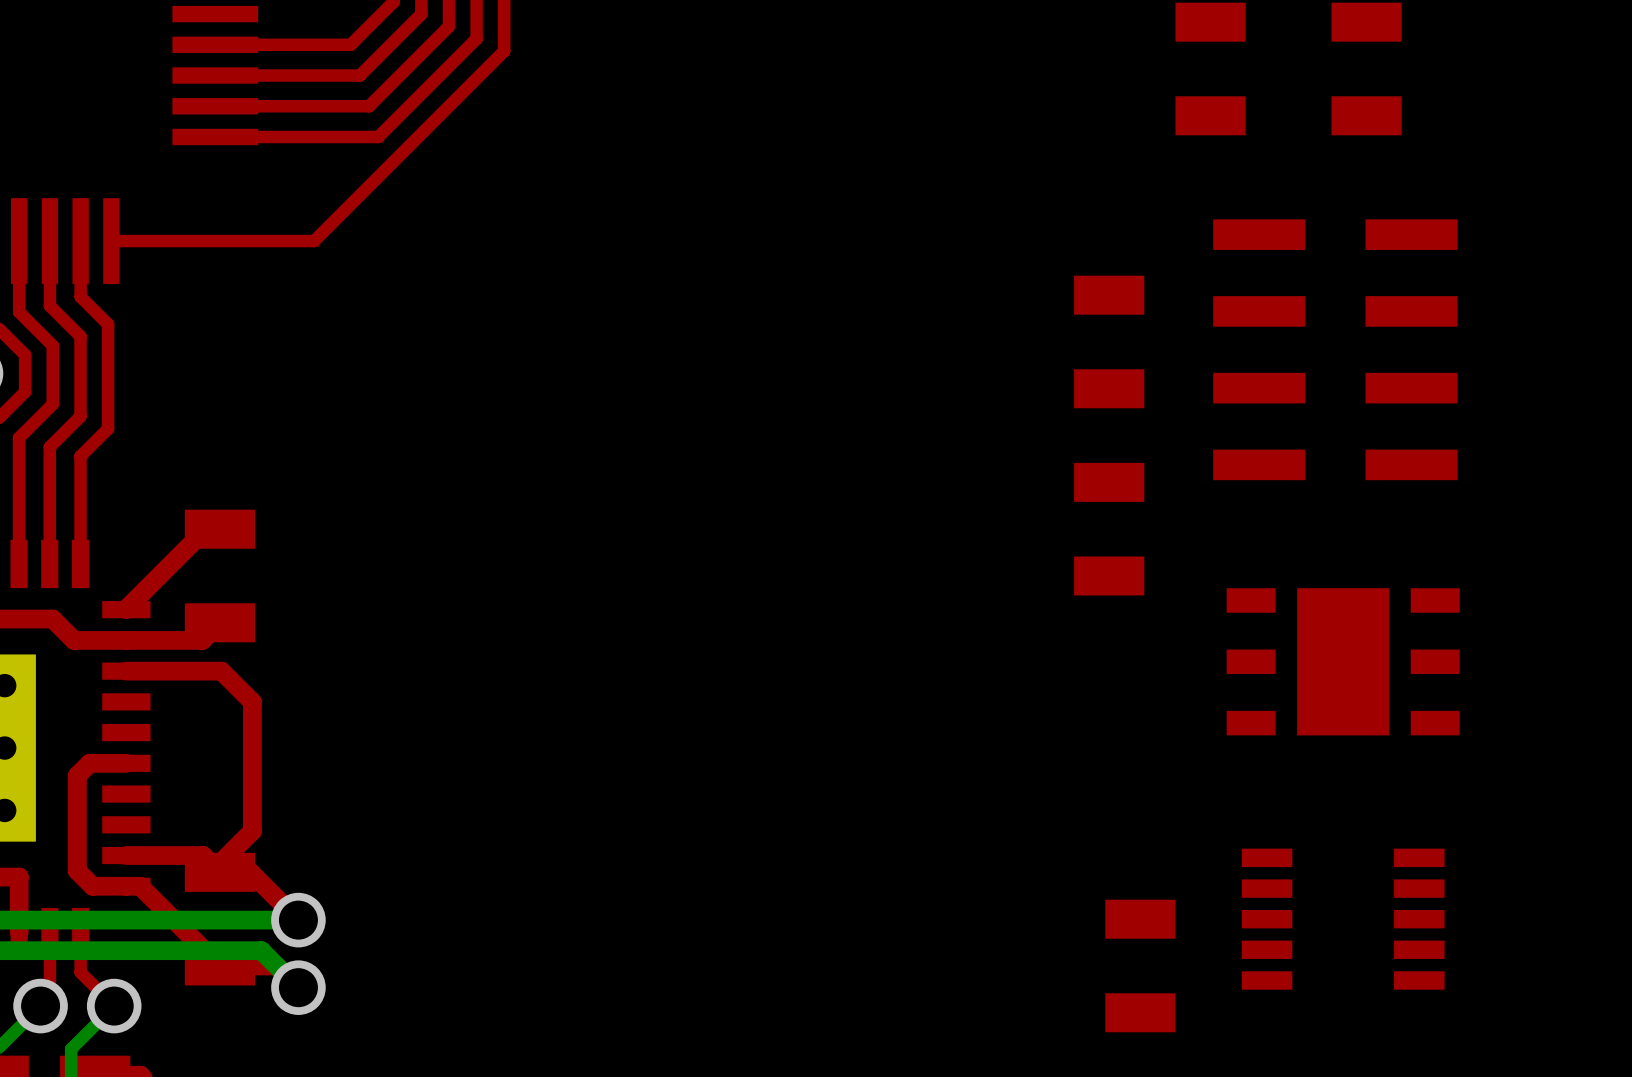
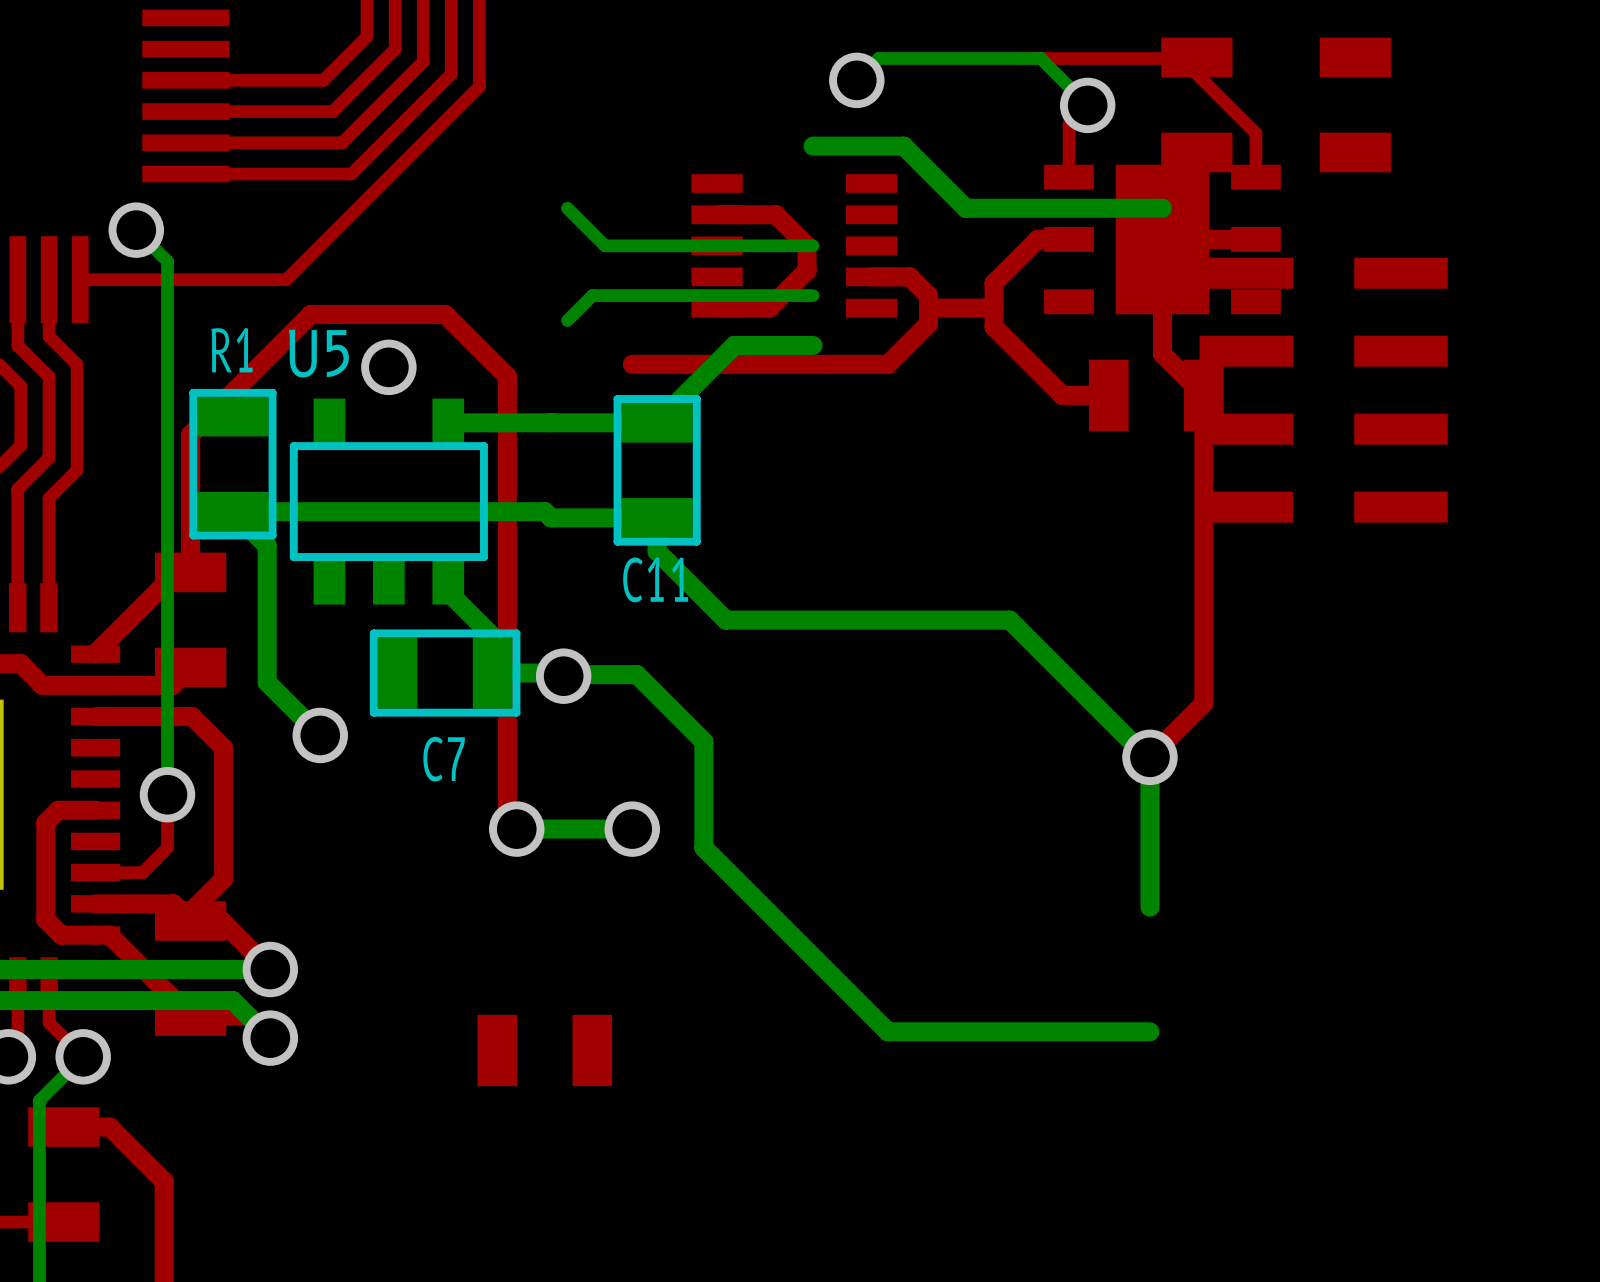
top track: none -> (1023, 58) (1181, 58) (1255, 133) (1255, 177)
bottom track: none -> (856, 80) (878, 58) (1040, 58) (1087, 105)
via: none -> (856, 80)
top track: none -> (1087, 105) (1068, 124) (1068, 177)
via: none -> (1087, 105)
bottom track: none -> (813, 146) (903, 146) (965, 208) (1162, 208)
bottom track: none -> (567, 208) (605, 245) (813, 245)
top track: none -> (717, 214) (775, 214) (807, 245) (807, 270) (769, 308) (717, 308)
bottom track: none -> (136, 230) (167, 261) (167, 794)
via: none -> (136, 230)
top track: none -> (1068, 239) (1037, 239) (994, 283) (994, 326) (1062, 395) (1108, 395)
top track: none -> (1255, 239) (1162, 239) (1162, 354) (1203, 395) (1203, 703) (1149, 757)
top track: none -> (871, 276) (909, 276) (928, 295) (928, 323) (888, 364) (632, 364)
bottom track: none -> (813, 295) (592, 295) (567, 320)
top track: none -> (994, 308) (928, 308)
bottom track: none -> (813, 345) (734, 345) (657, 422) (448, 422)
via: none -> (388, 367)
part rotation: 0° (1109, 341) -> 90° clockwise (1156, 395)
R1: none -> (232, 464)
C11: none -> (657, 470)
U5: none -> (388, 501)
top track: none -> (190, 572) (190, 434) (310, 314) (445, 314) (507, 376) (507, 819) (516, 829)
part: (1109, 529) -> none
bottom track: none -> (448, 580) (448, 592) (492, 636) (492, 673) (560, 673) (563, 676) (565, 674) (636, 674) (703, 741) (703, 847) (887, 1031) (1149, 1031)
C7: none -> (445, 673)
via: none -> (563, 676)
part position: (1343, 661) -> (1162, 239)
bottom track: none -> (320, 735) (267, 682) (267, 545) (232, 511) (544, 511) (551, 517) (657, 517) (657, 551) (725, 620) (1009, 620) (1149, 760)
via: none -> (320, 735)
bottom track: none -> (1149, 757) (1149, 907)
via: none -> (1149, 757)
top track: none -> (167, 794) (167, 847) (142, 872) (95, 872)
via: none -> (167, 794)
via: none -> (516, 829)
bottom track: none -> (632, 829) (516, 829)
via: none -> (632, 829)
part position: (1343, 919) -> (794, 245)
part: (1140, 965) -> none
part: none -> (544, 1050)

